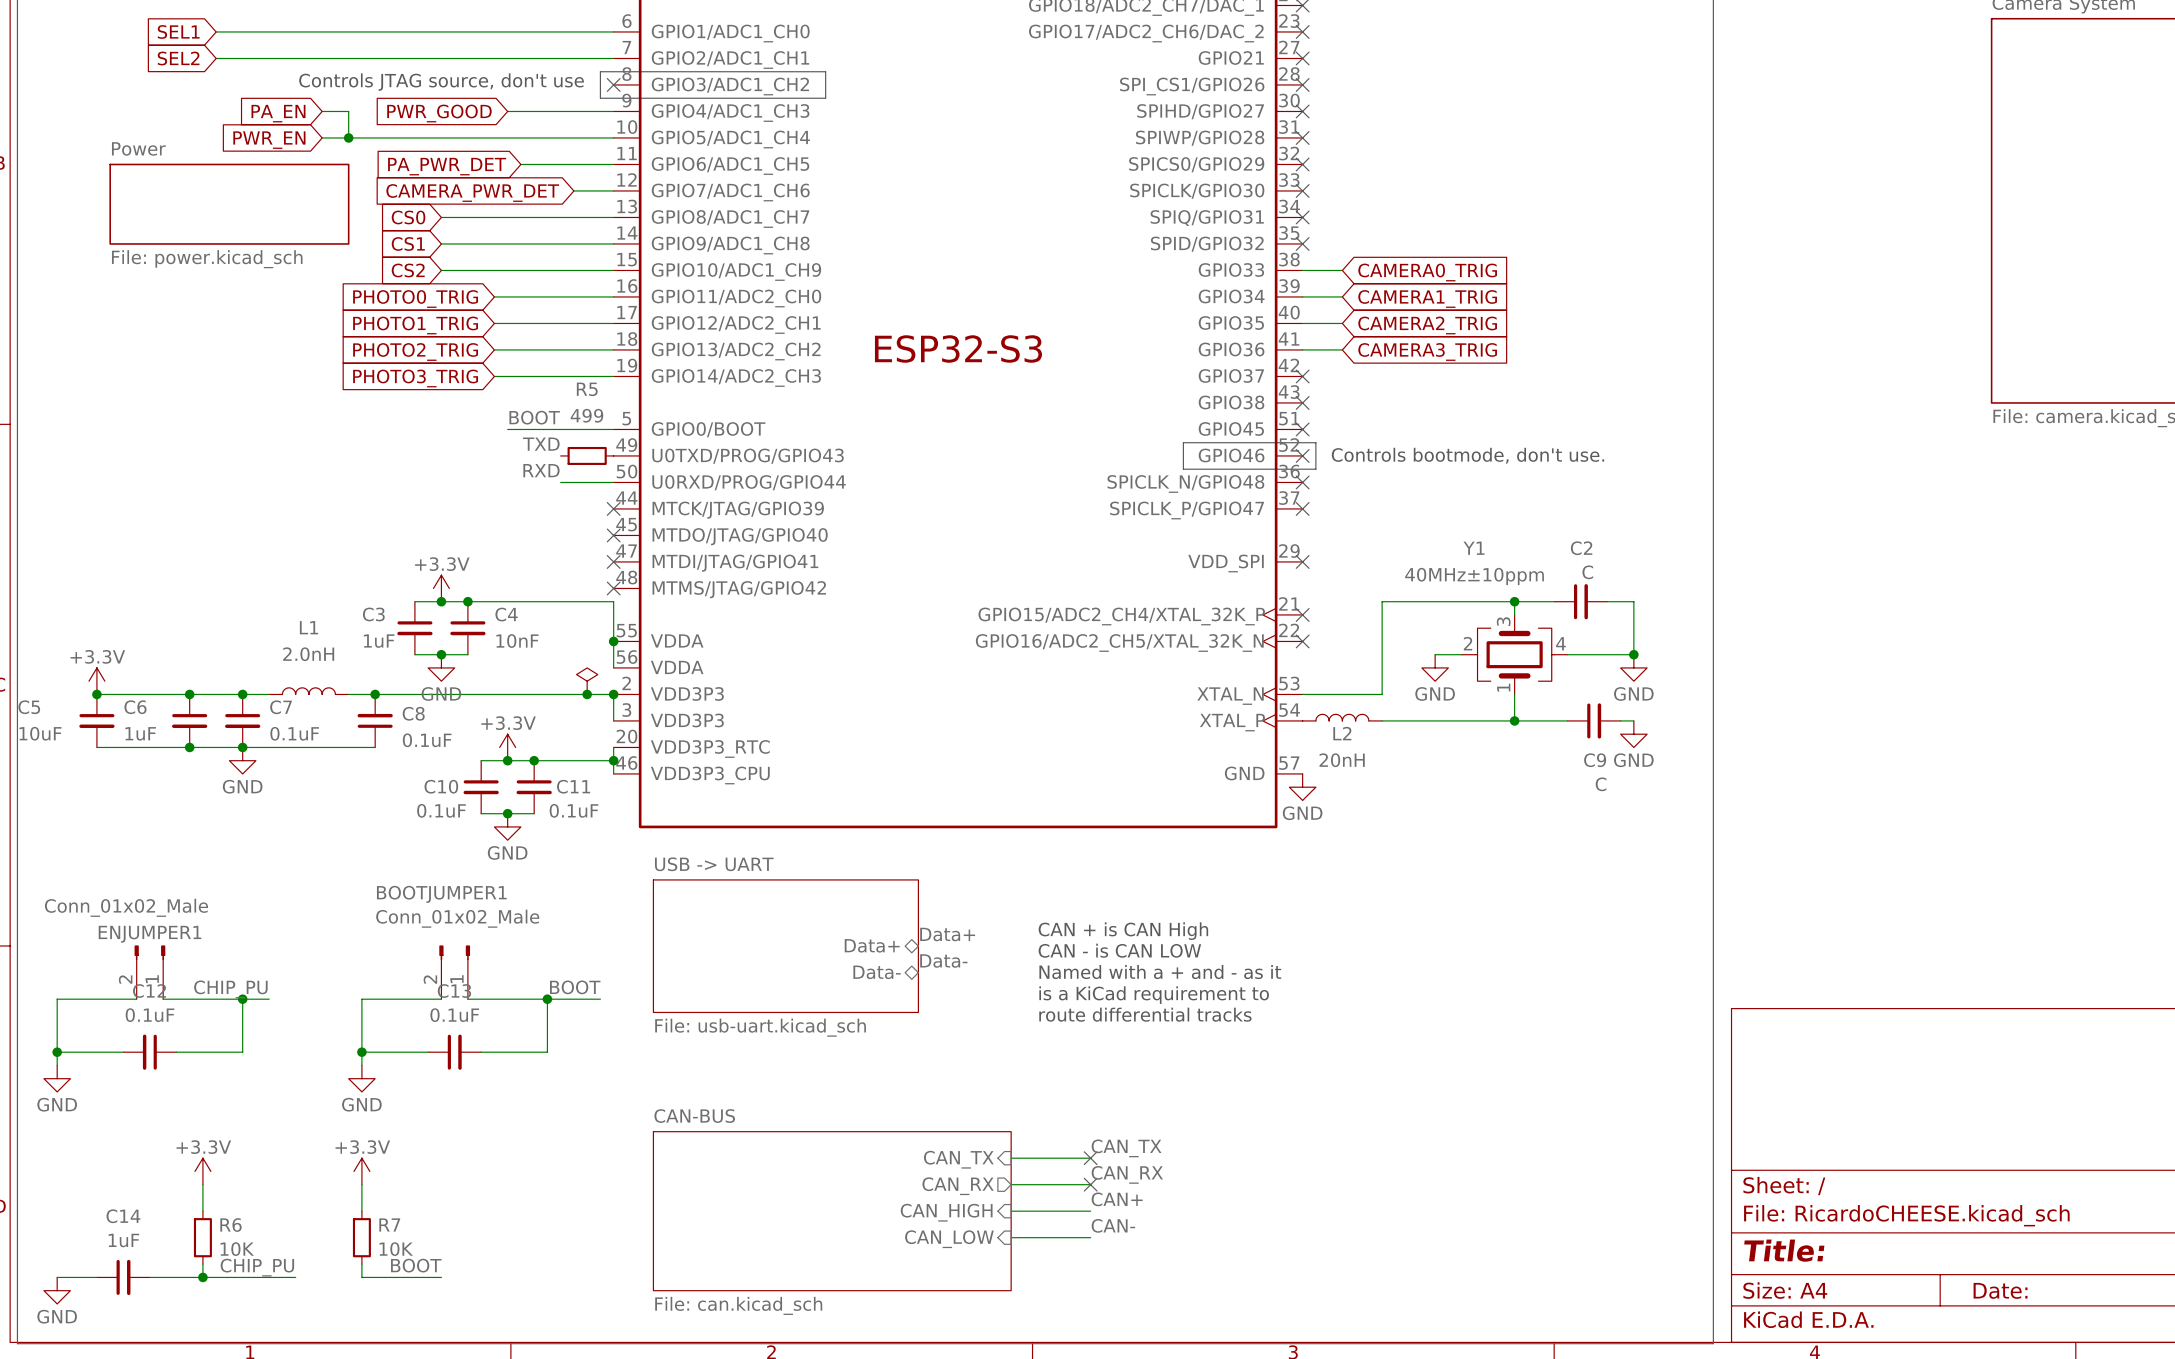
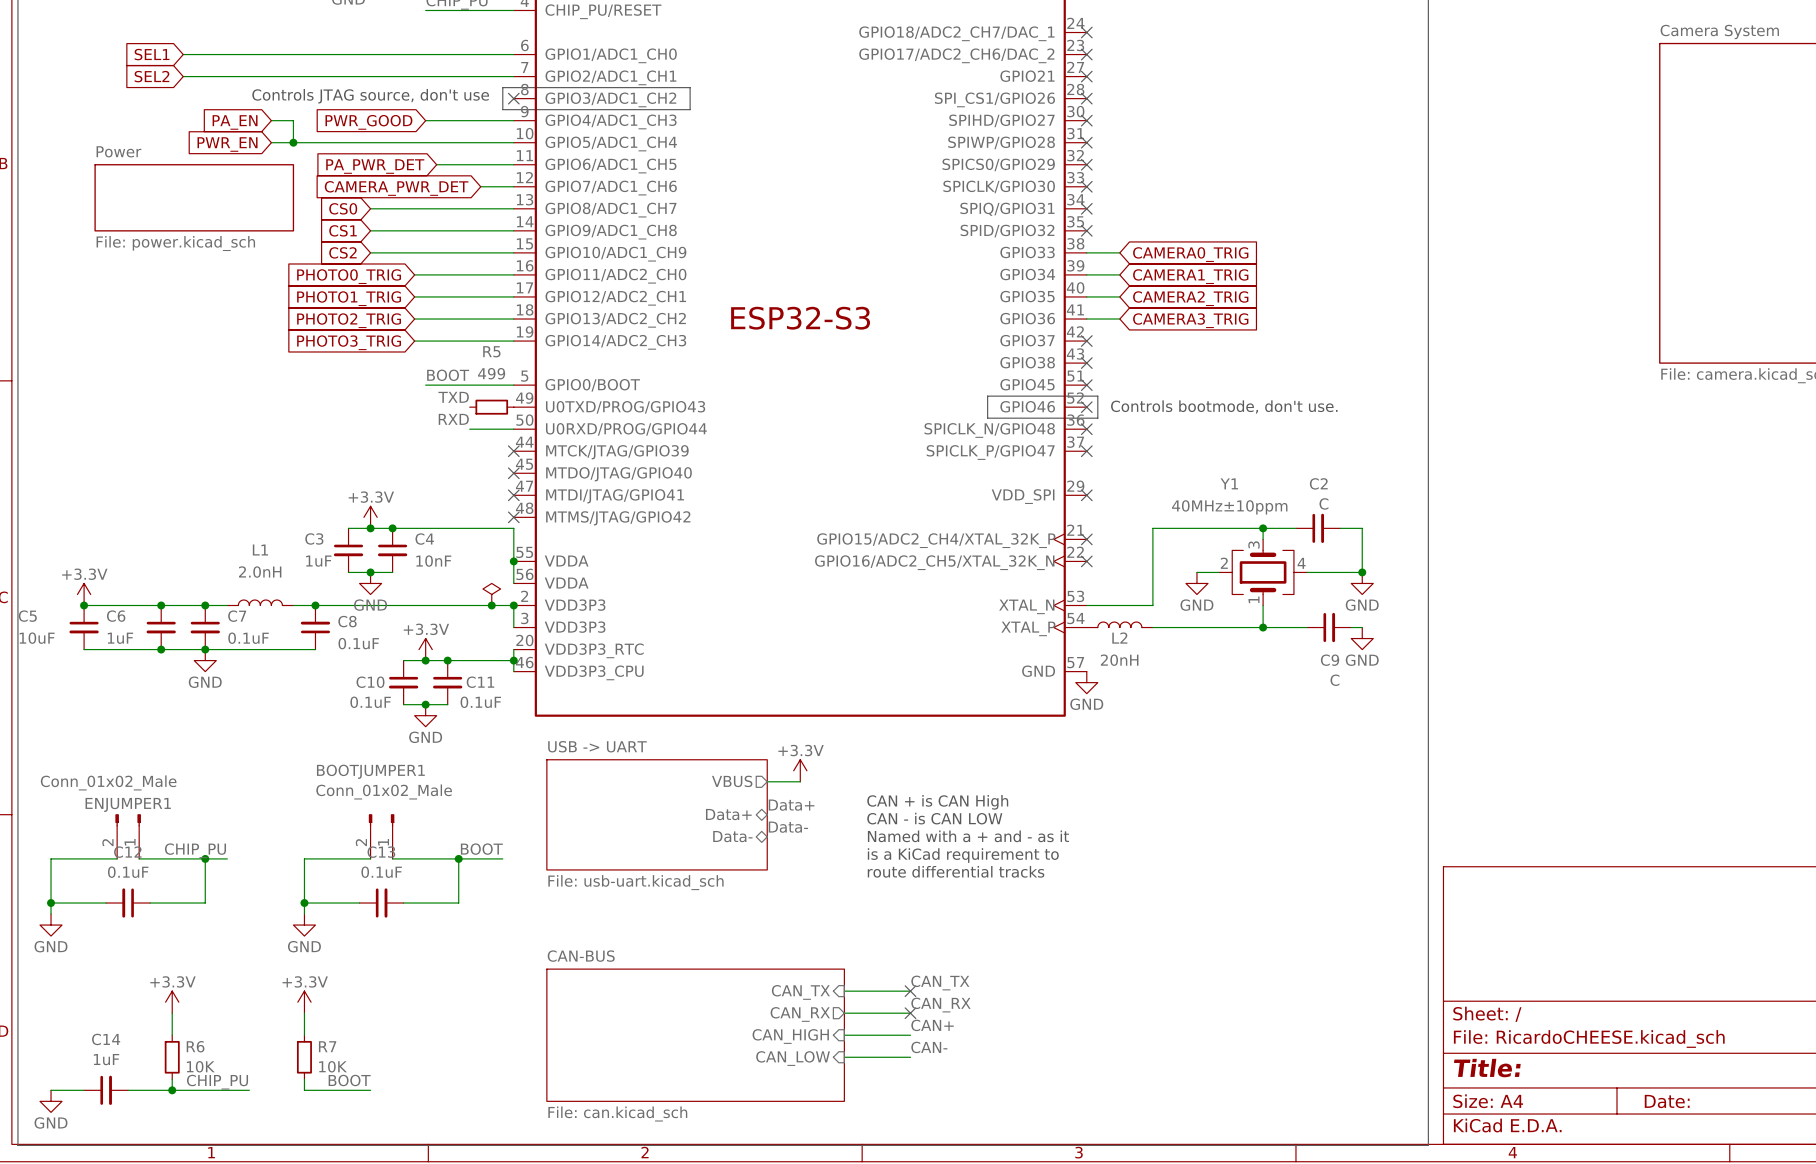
power symbol: none -> +3.3V (800, 770)
sheet pin: none -> VBUS (732, 781)
wire: none -> (767, 781) (800, 781)

